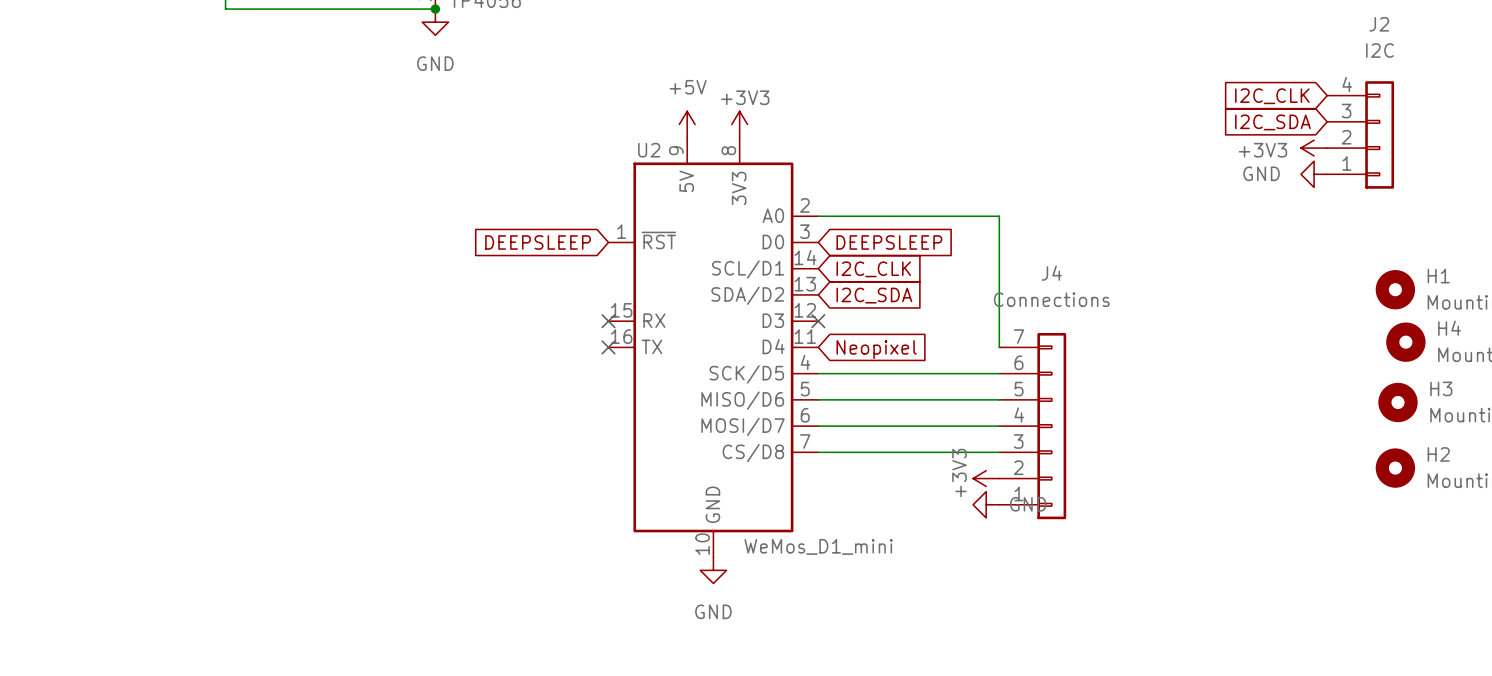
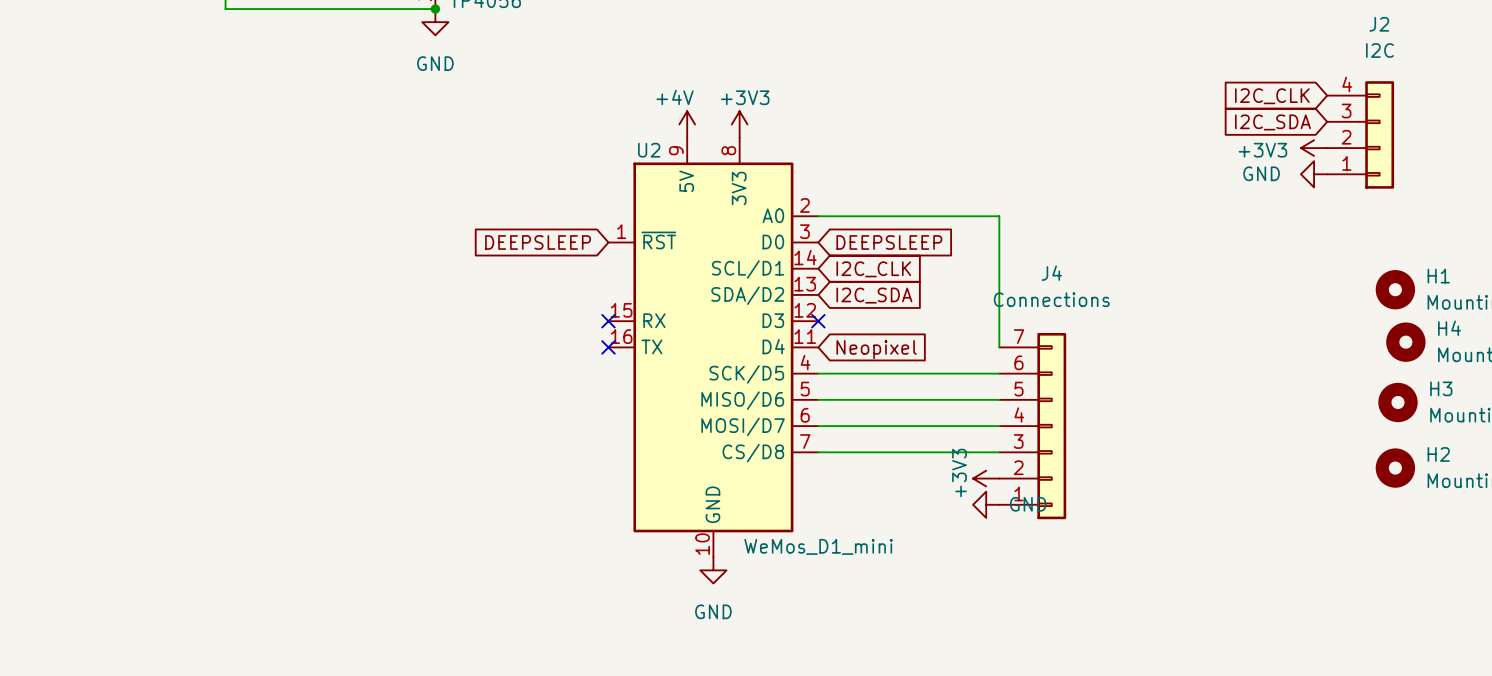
power symbol: +5V (687, 124) -> +4V (687, 124)

